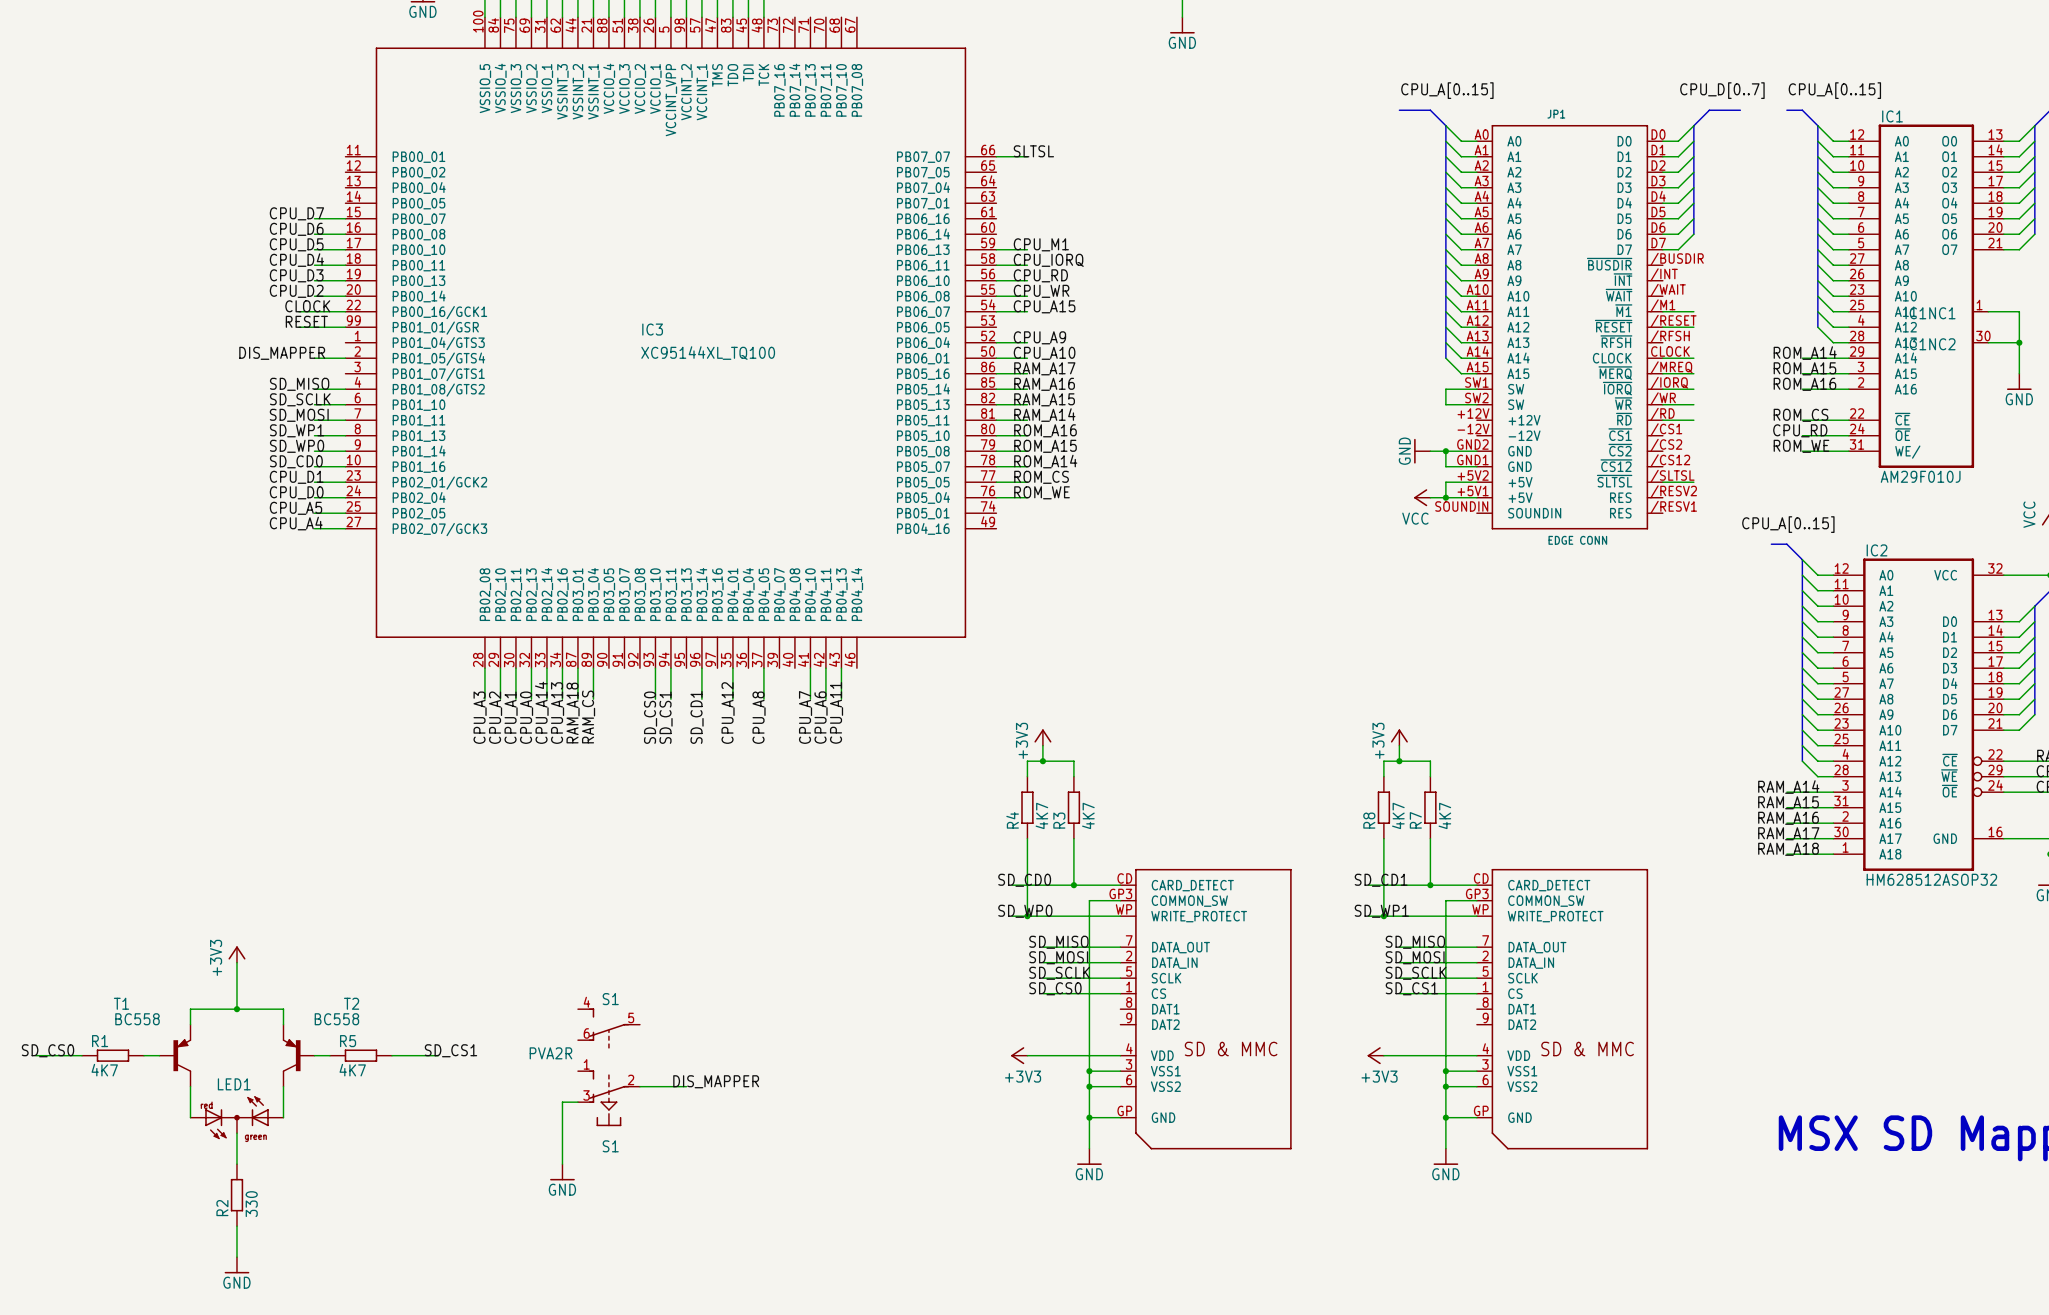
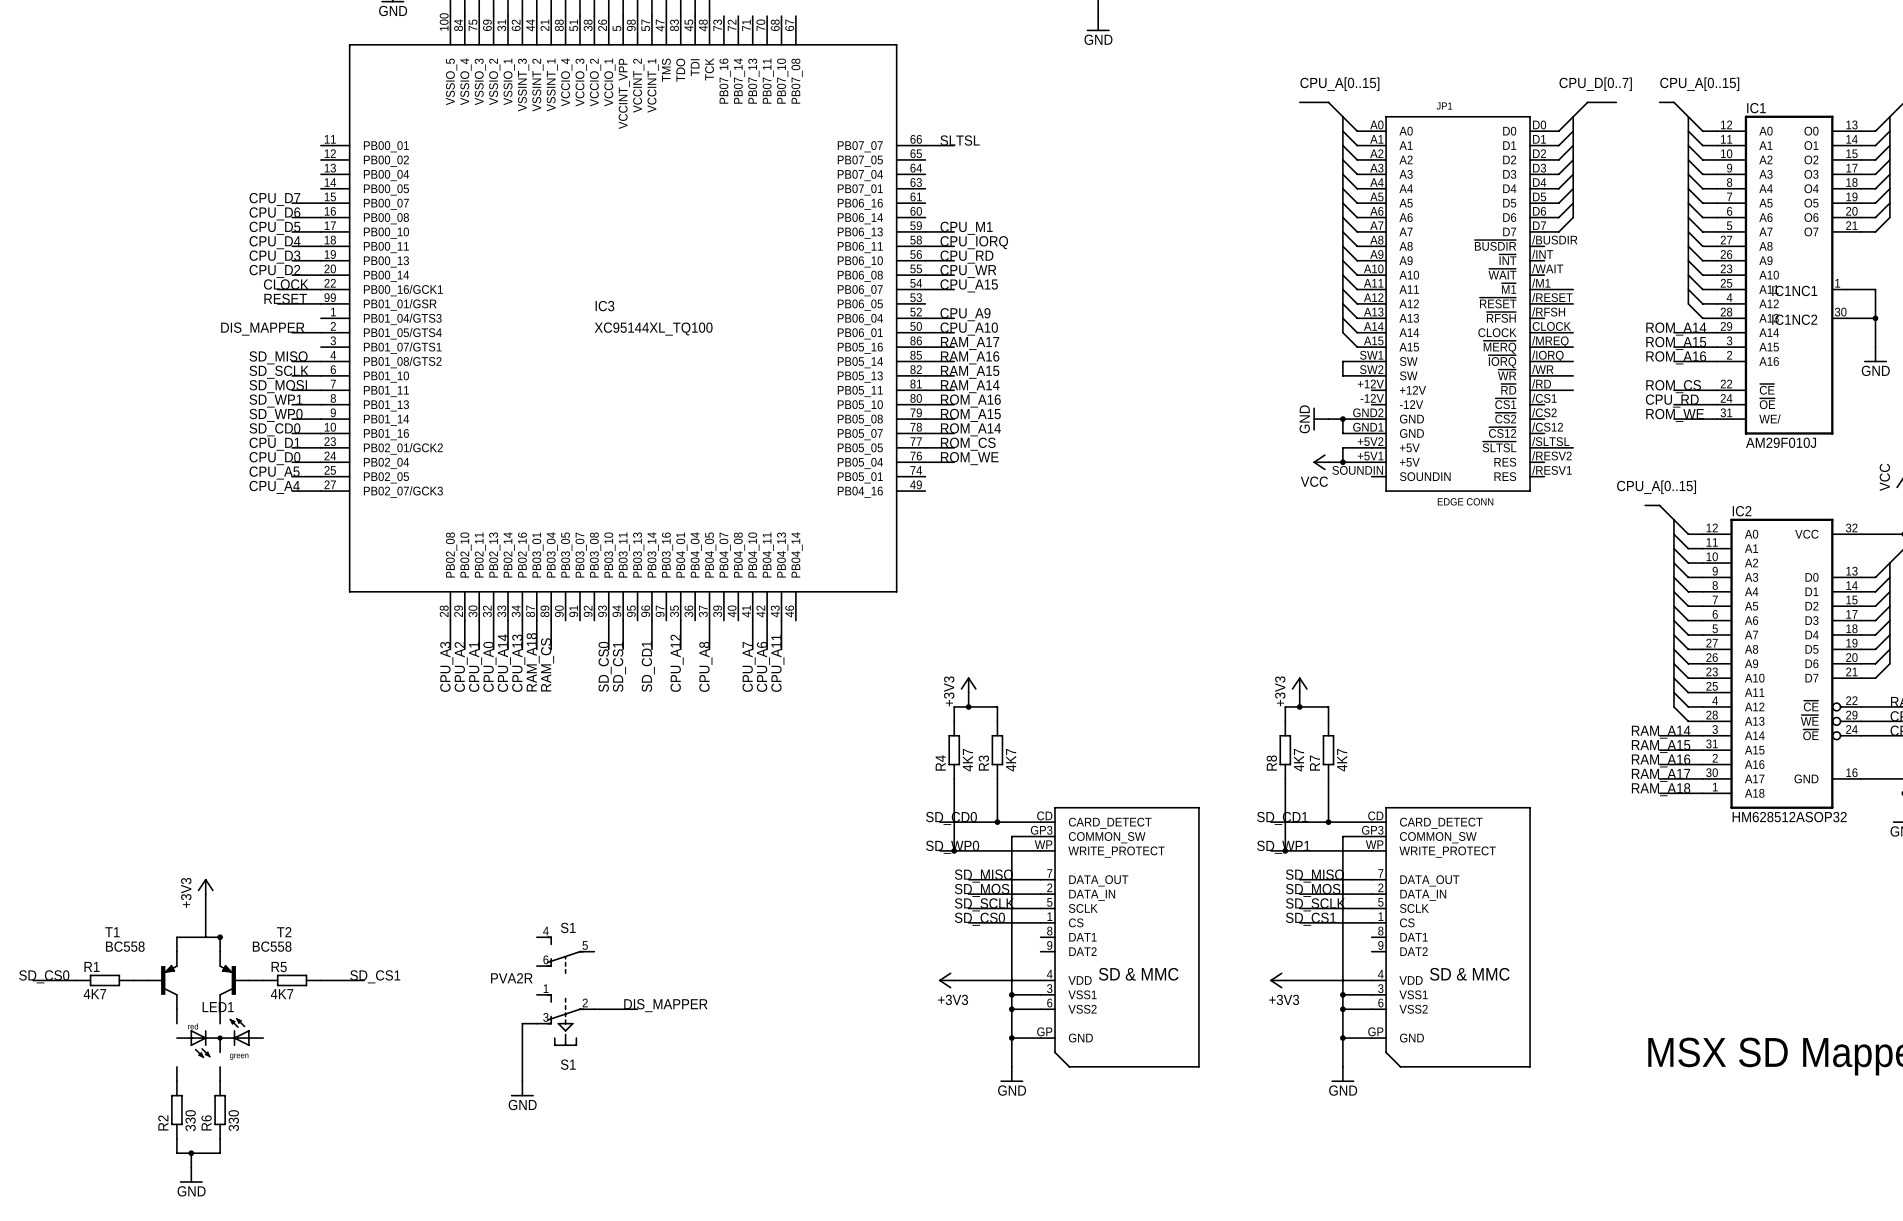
power symbol position: +3V3 (236, 954) -> +3V3 (205, 886)
wire: none -> (205, 894) (205, 937)
wire: (236, 962) (236, 1009) (283, 1009) (283, 1024) -> none
wire: none -> (220, 937) (220, 951)
label position: SD_CS1 (450, 1050) -> SD_CS1 (375, 976)
T2 position: (298, 1055) -> (234, 980)
wire: (314, 1055) (329, 1055) -> (248, 980) (263, 980)
R5 position: (360, 1055) -> (292, 980)
wire: (391, 1055) (438, 1055) -> (364, 980) (320, 980)
wire: (283, 1086) (283, 1117) -> none
wire: (190, 1102) (190, 1117) -> (176, 1066) (176, 1081)
wire: (236, 1133) (236, 1148) -> (220, 1009) (220, 1023)
R2: none -> 330 (176, 1110)
R2 name: R2 (222, 1208) -> R6 (206, 1122)
wire: none -> (191, 1153) (191, 1167)
junction: none -> (191, 1153)
wire: (236, 1241) (236, 1257) -> (220, 1153) (176, 1153) (176, 1138)
power symbol position: GND (236, 1265) -> GND (191, 1175)

